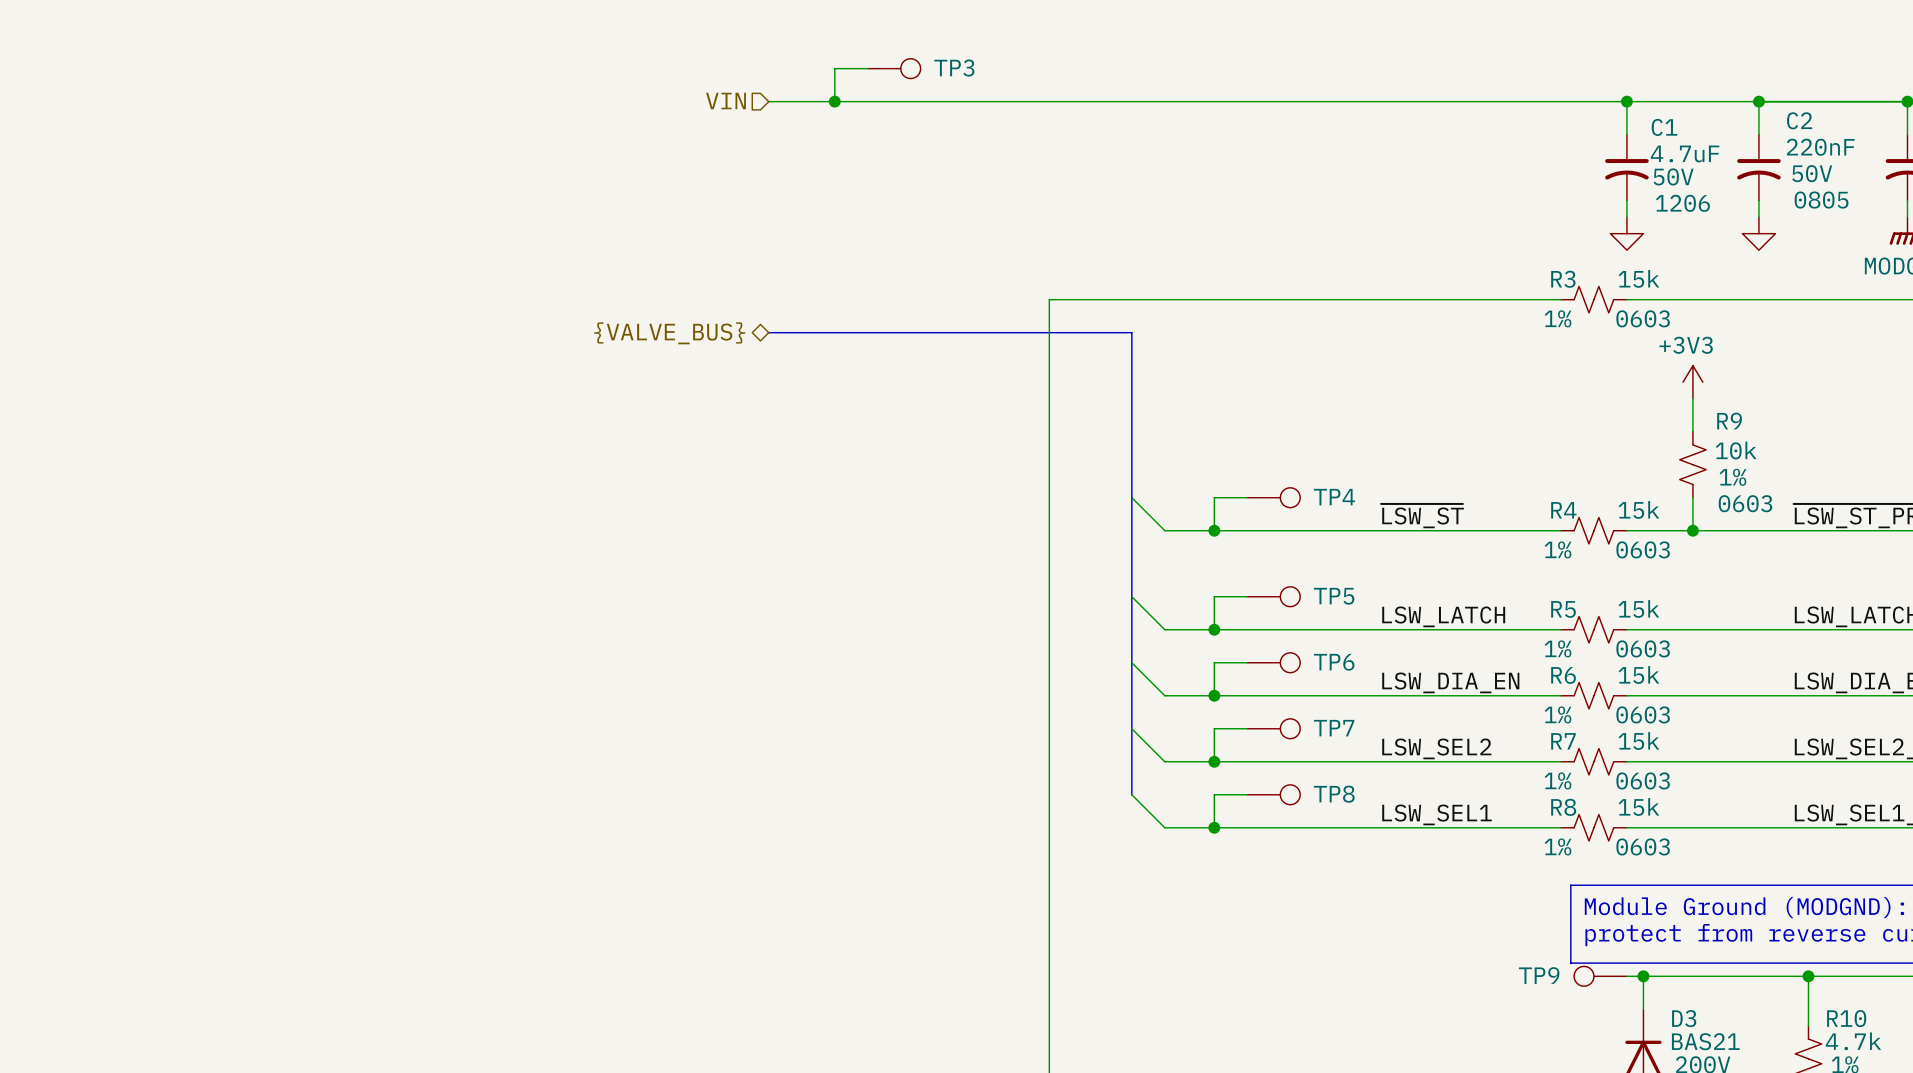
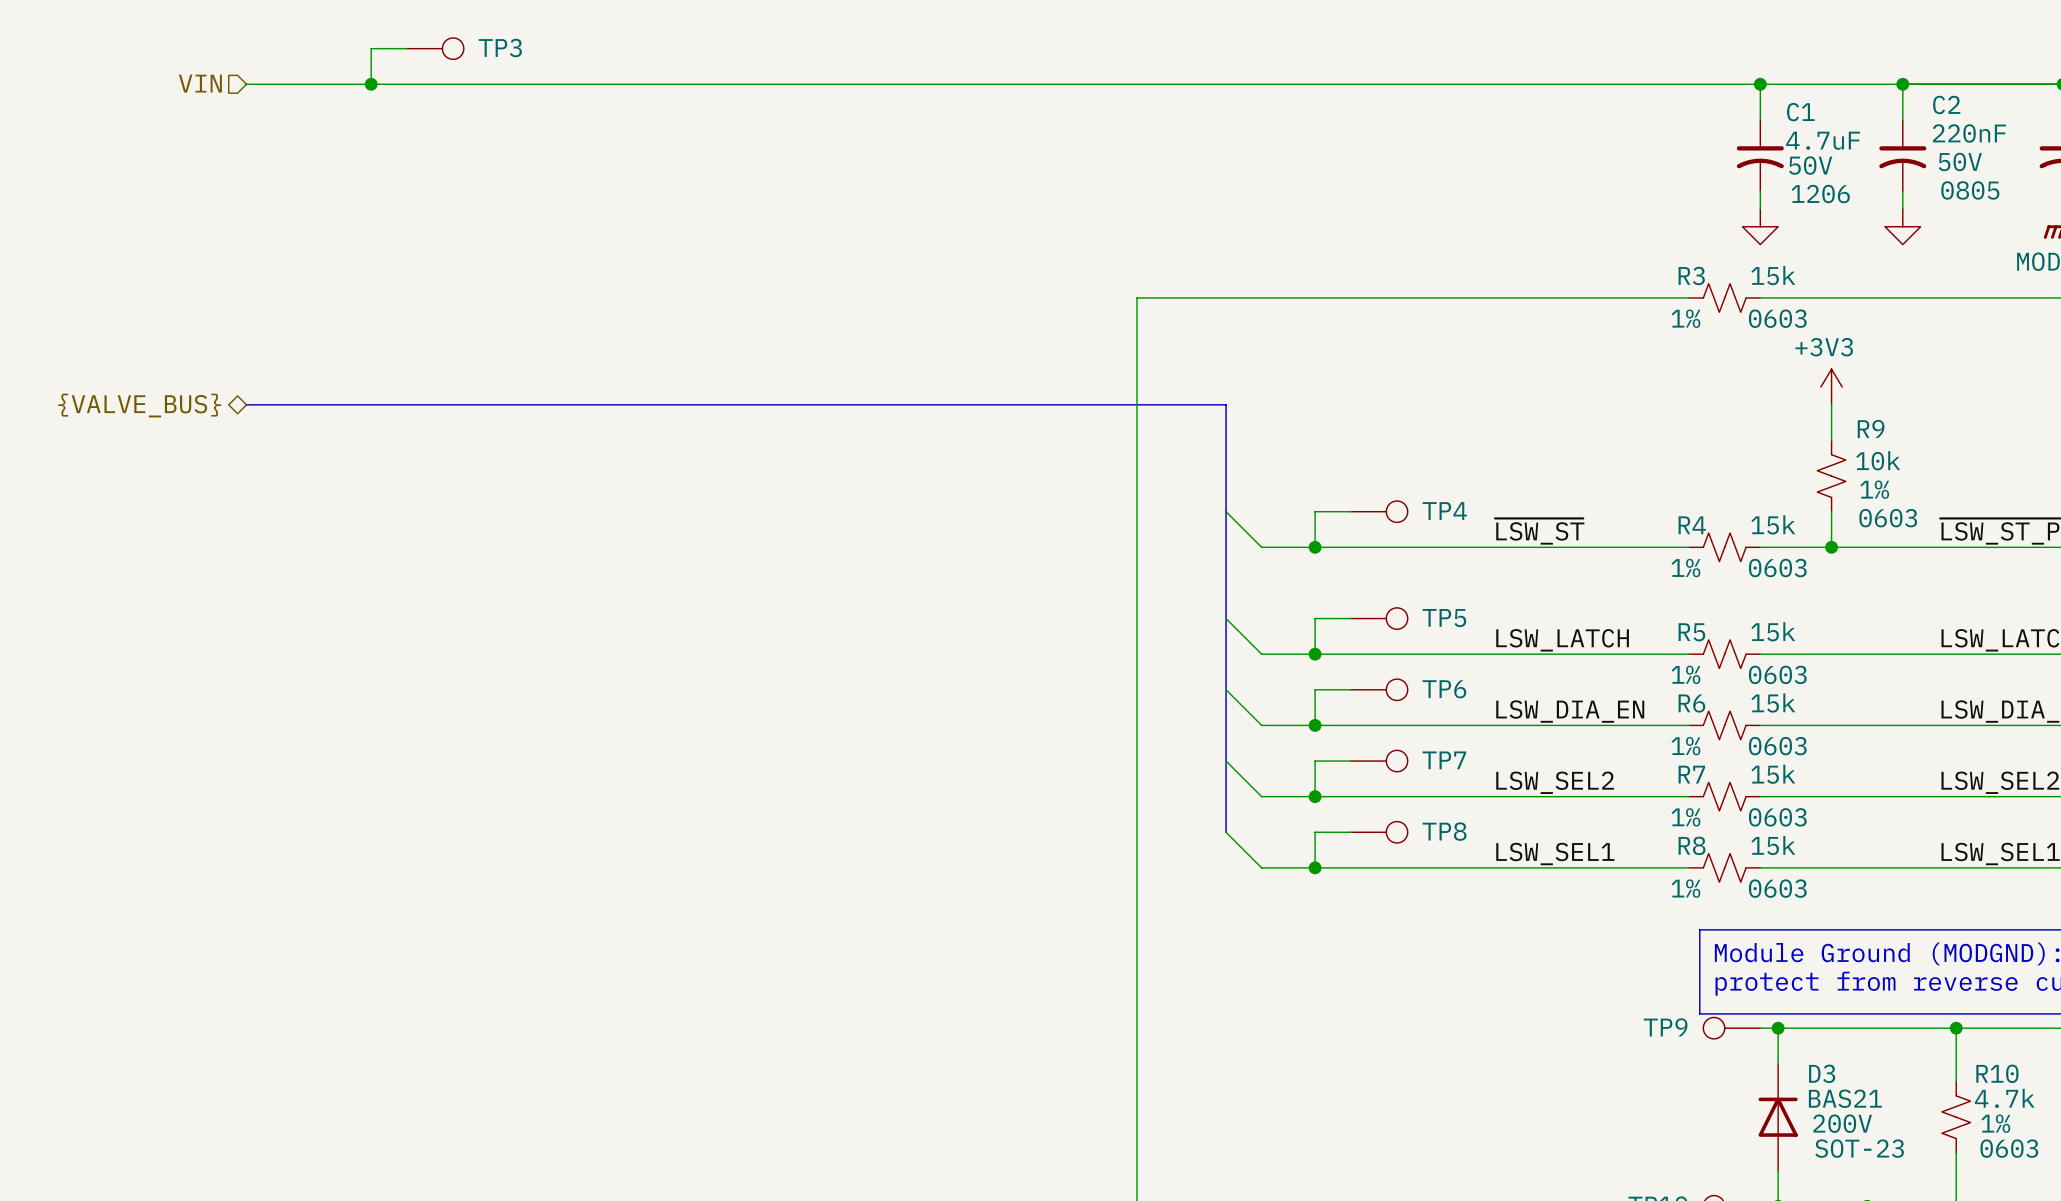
wire: none -> (406, 48) (371, 48) (371, 84)
wire: (867, 68) (834, 68) (834, 101) -> none
TP3 position: (894, 68) -> (435, 48)
hierarchical label: none -> VIN (200, 83)
wire: none -> (246, 84) (834, 84)
junction: none -> (371, 84)
hierarchical label: VIN (726, 101) -> none
junction: (834, 101) -> none
bus: (768, 332) (1131, 332) (1131, 398) -> (246, 404) (1226, 404)
hierarchical label: {VALVE_BUS} (669, 333) -> none
hierarchical label: none -> {VALVE_BUS} (139, 405)

